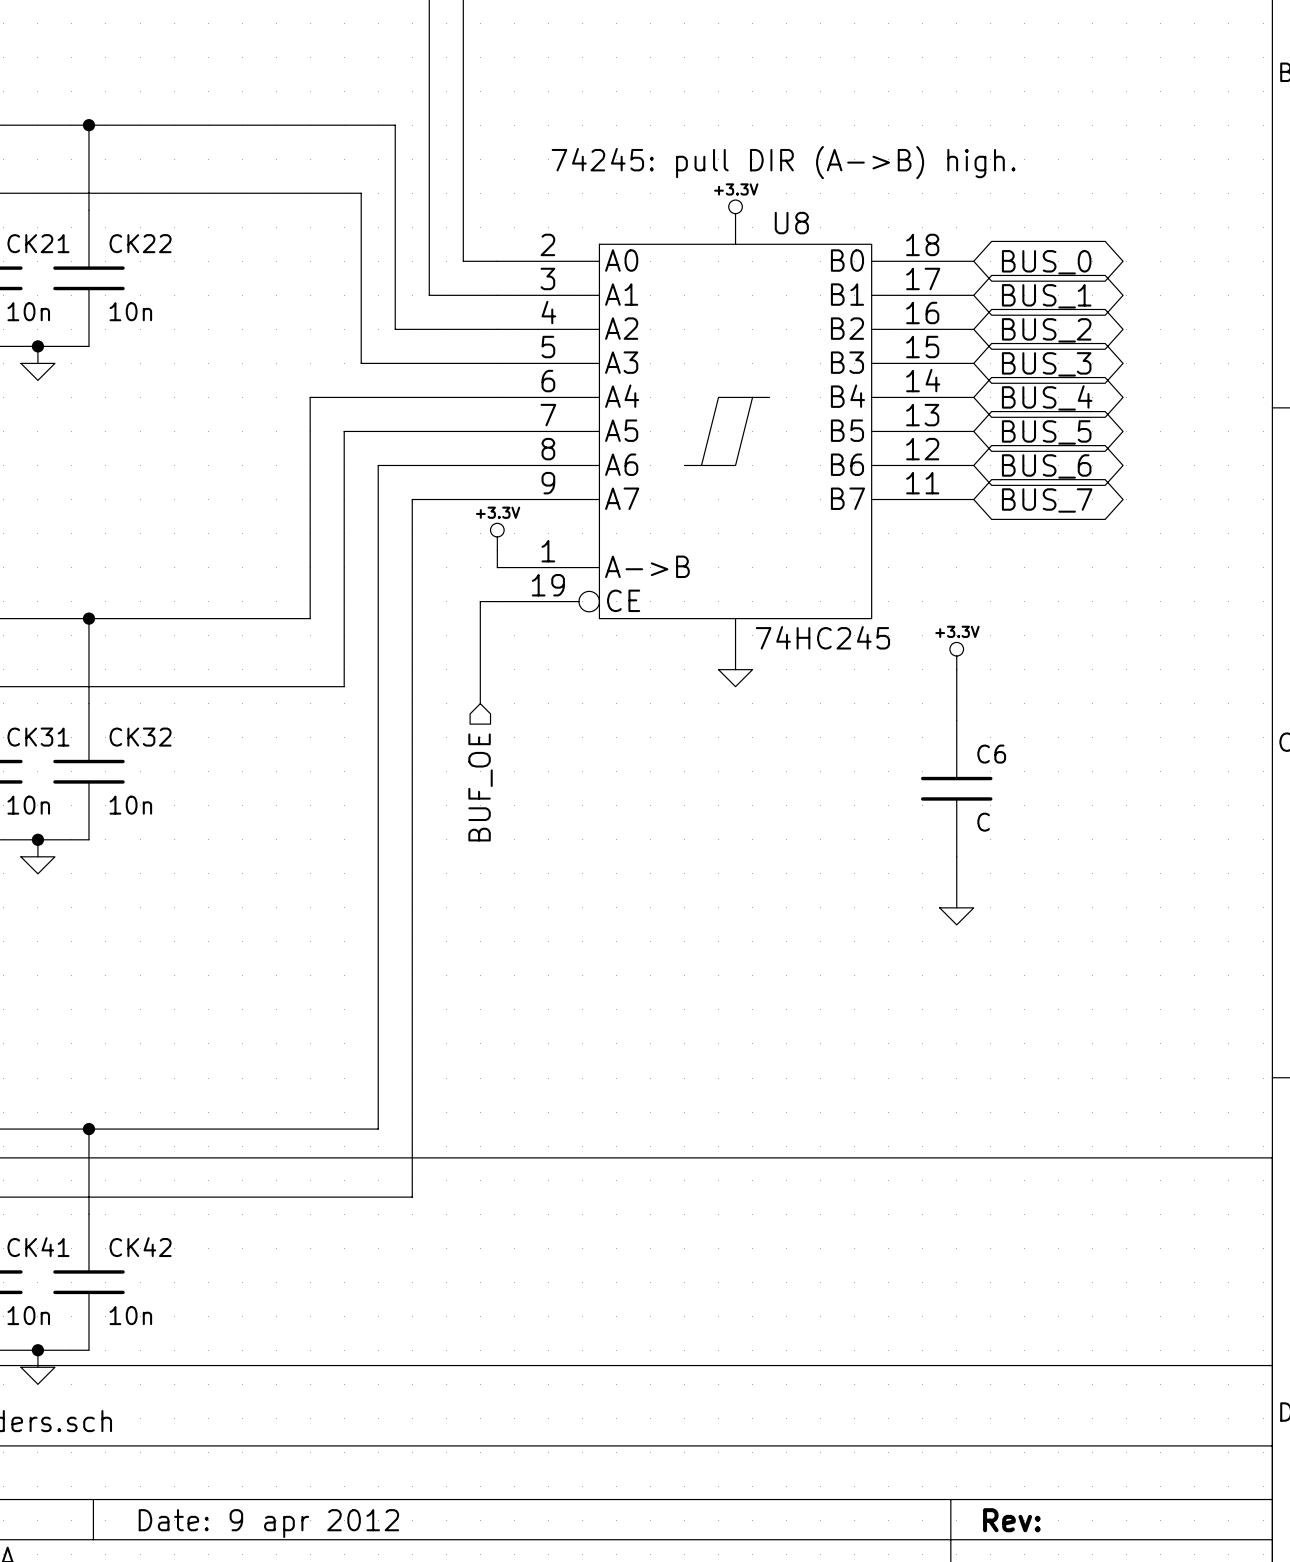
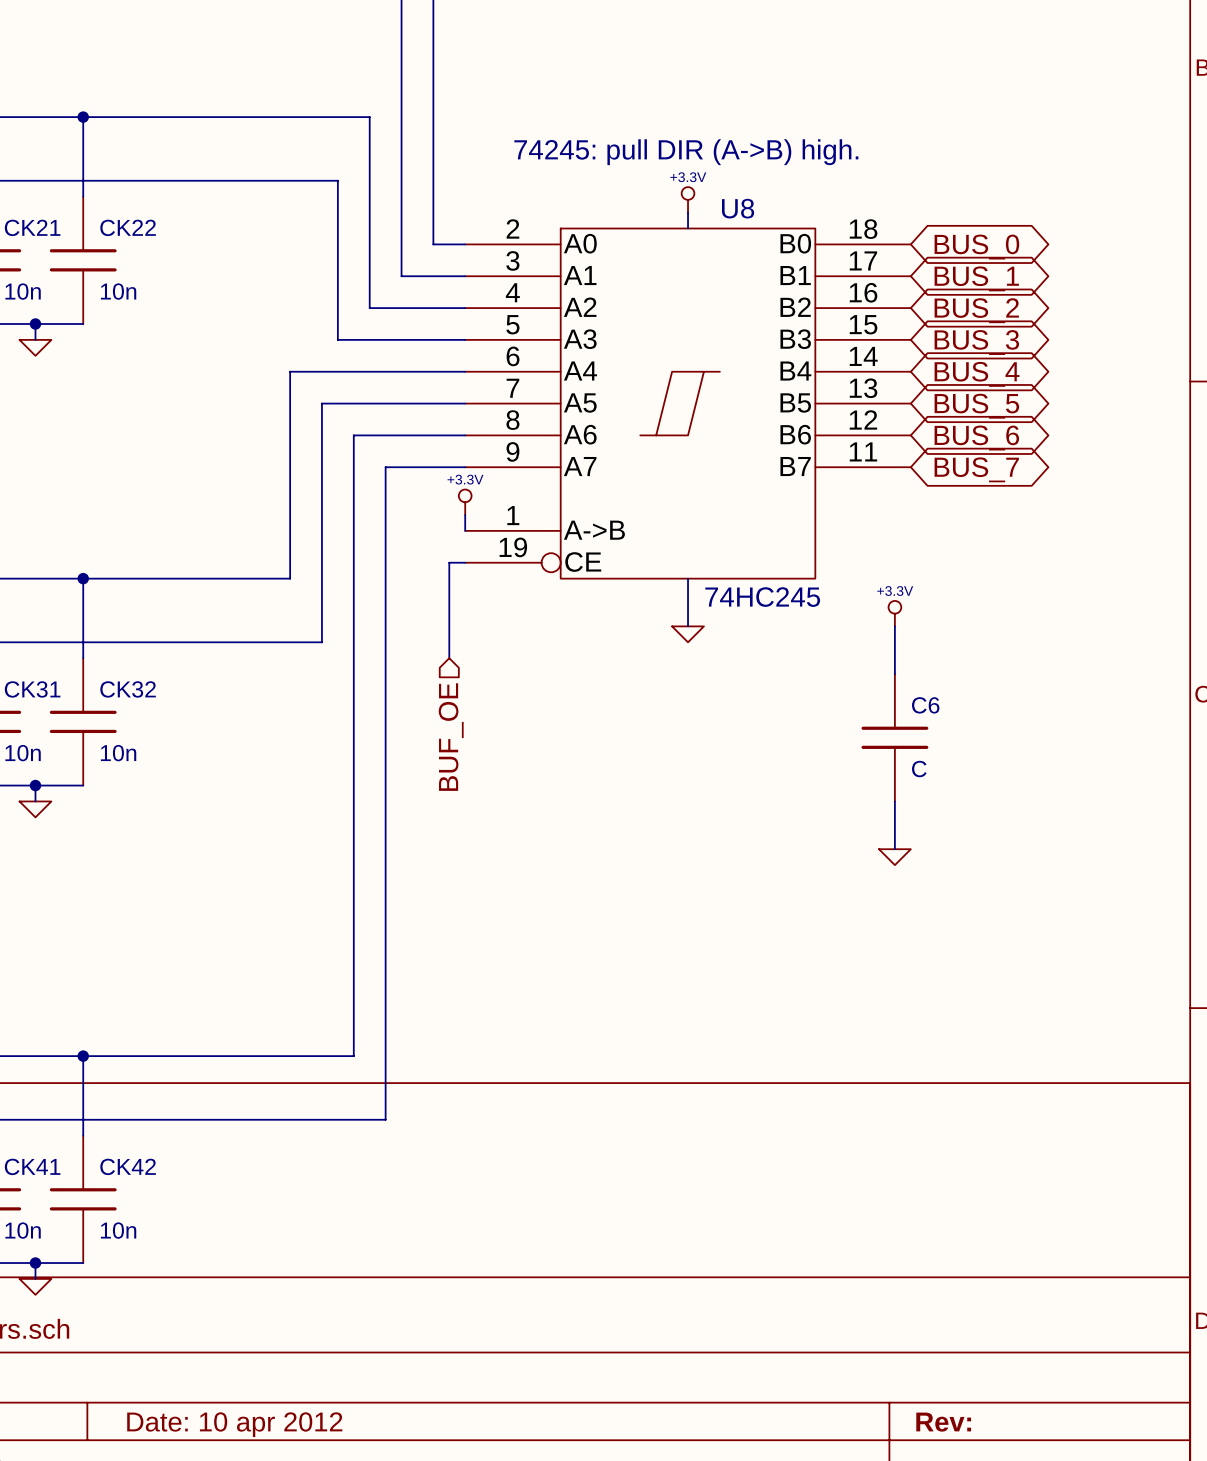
title block: Date: 9 apr 2012 (268, 1523) -> Date: 10 apr 2012 (234, 1424)

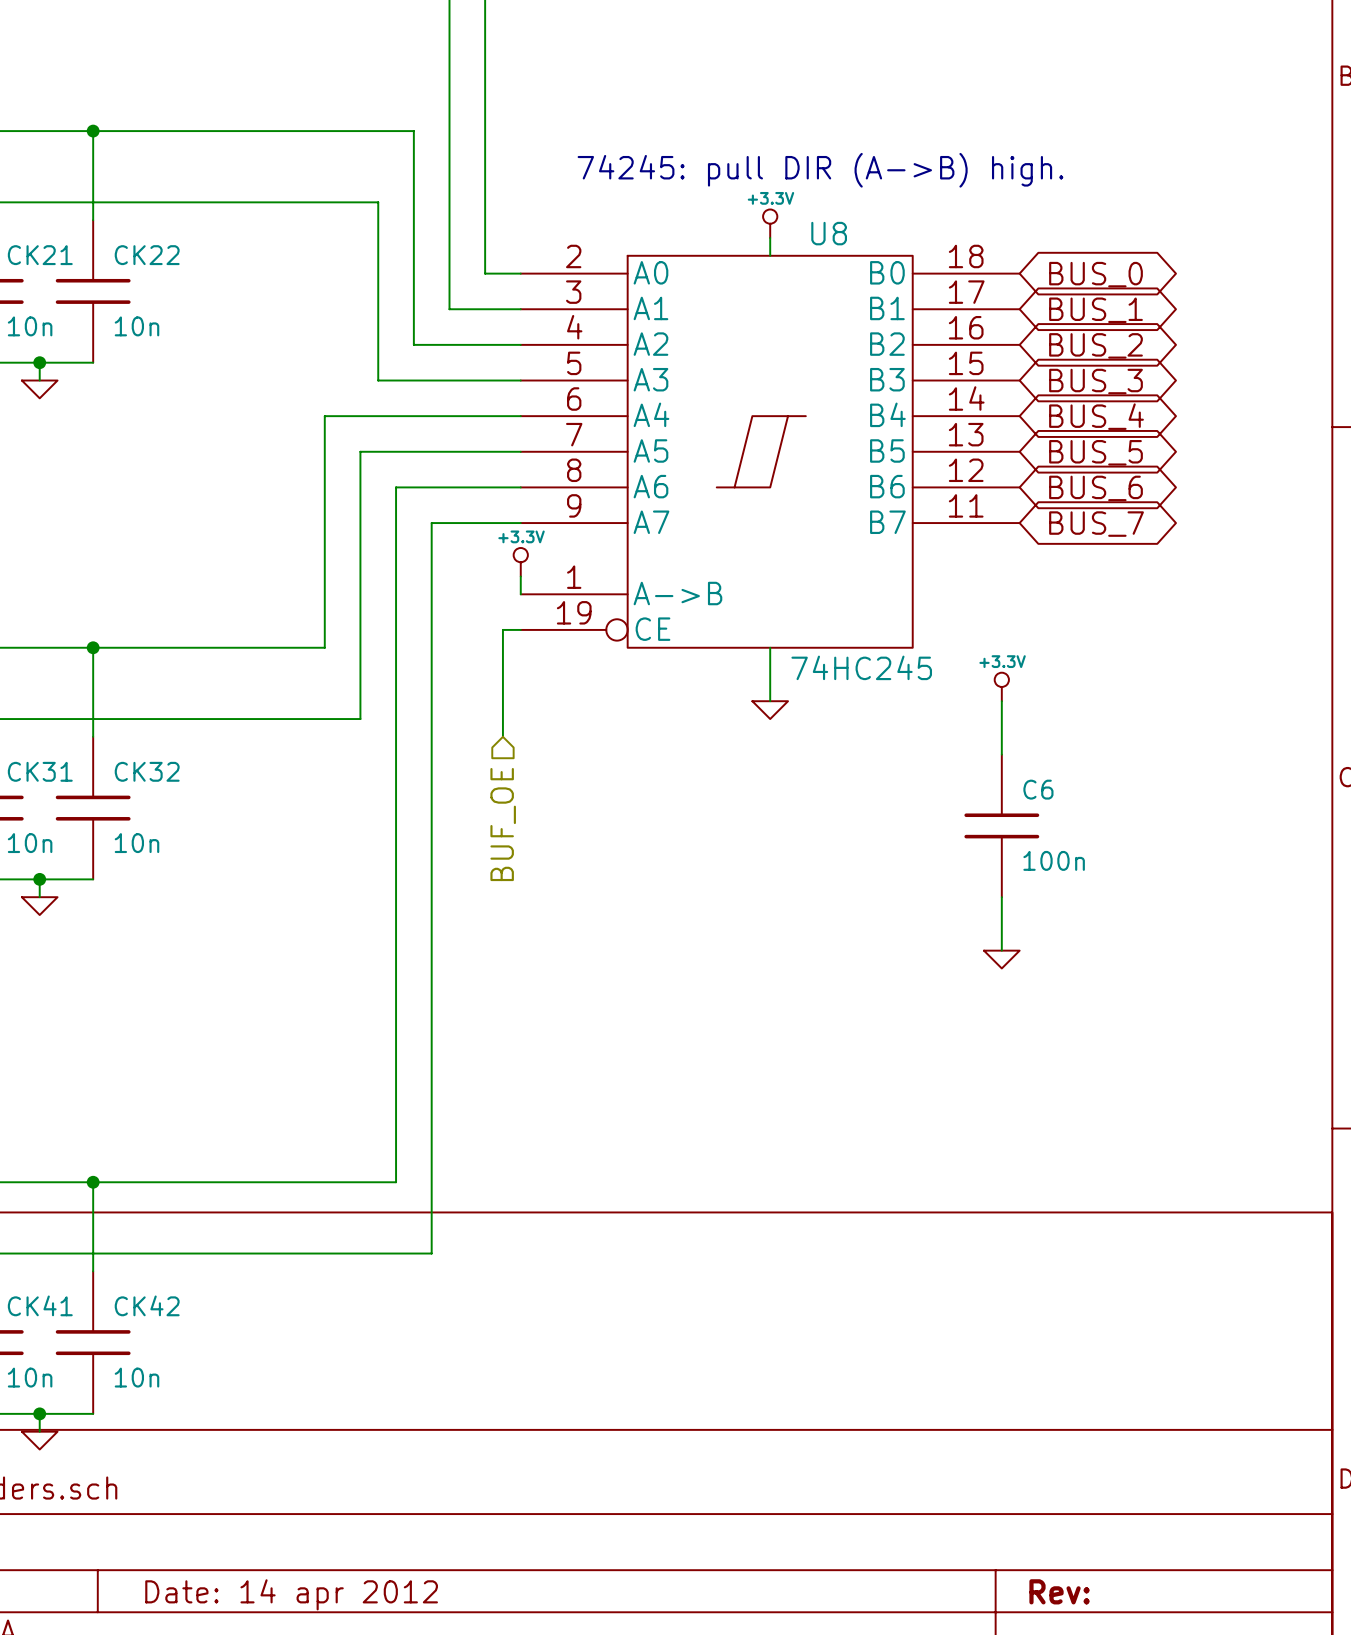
C6 value: C (919, 769) -> 100n (1054, 860)
title block: Date: 10 apr 2012 (234, 1424) -> Date: 14 apr 2012 (291, 1594)

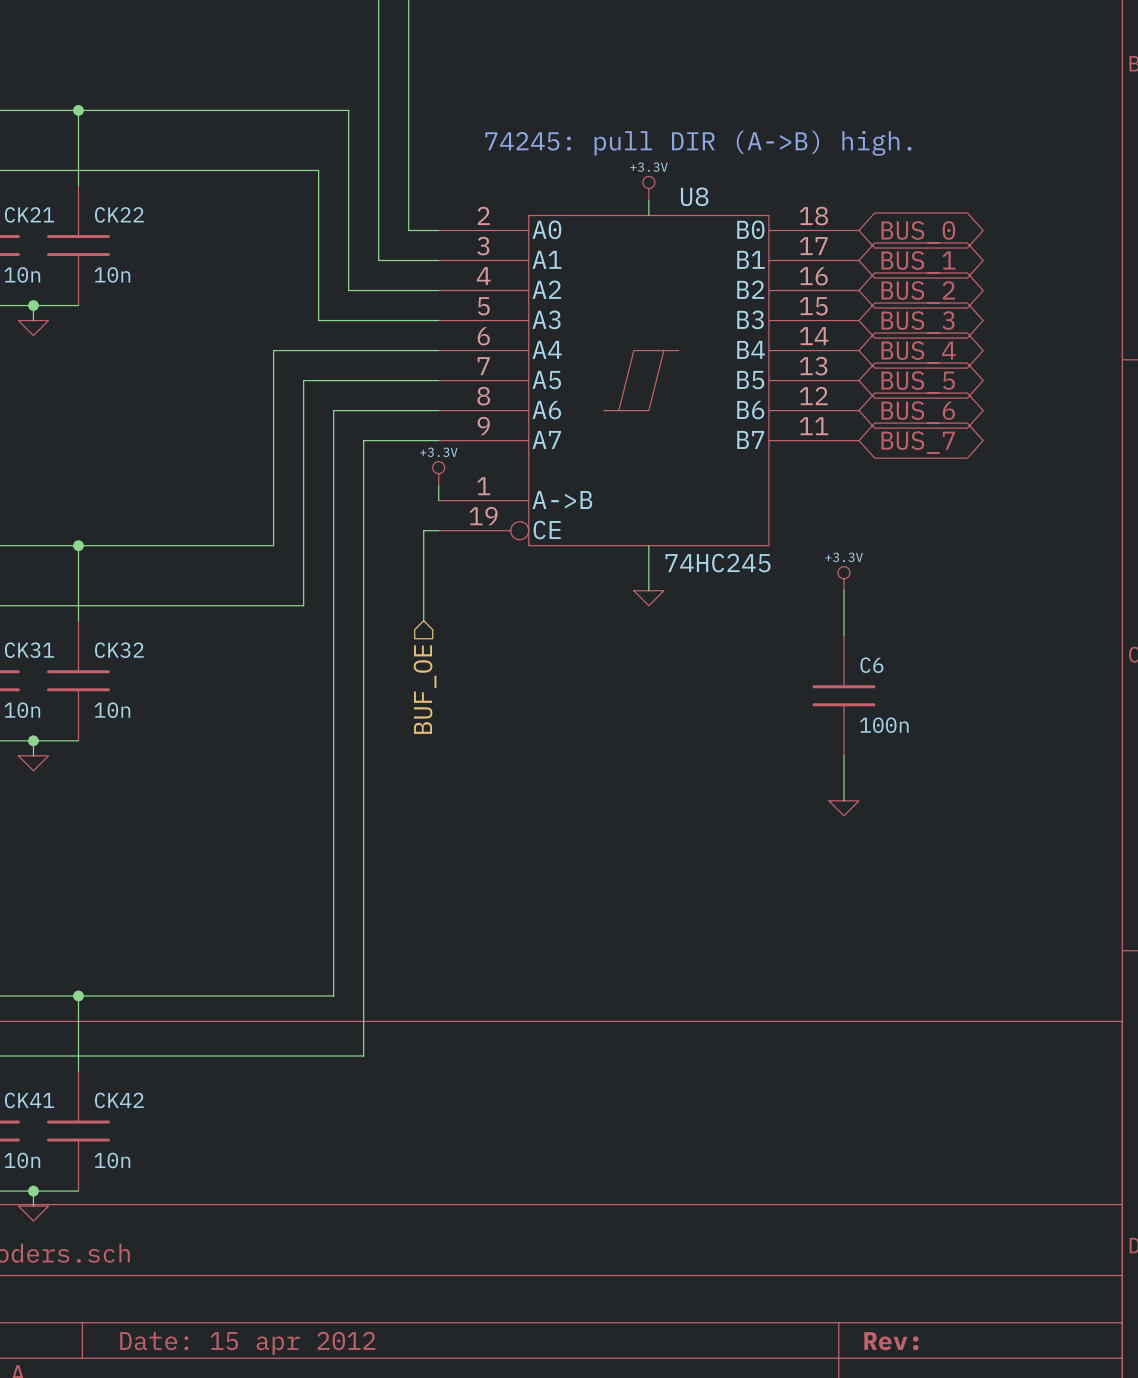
title block: Date: 14 apr 2012 (291, 1594) -> Date: 15 apr 2012 (247, 1343)

